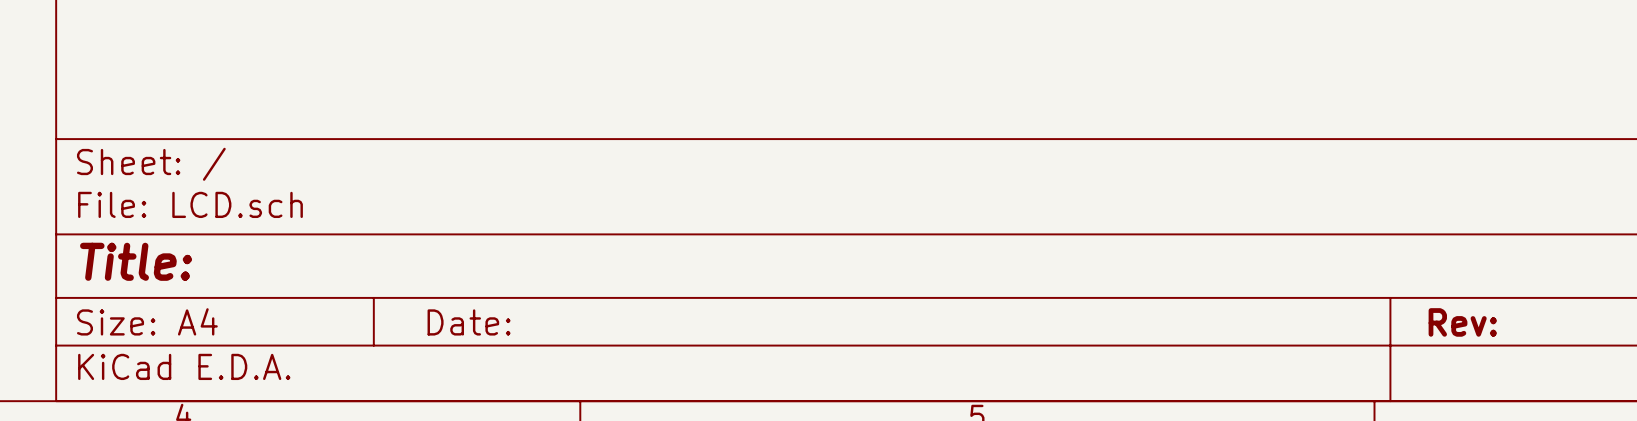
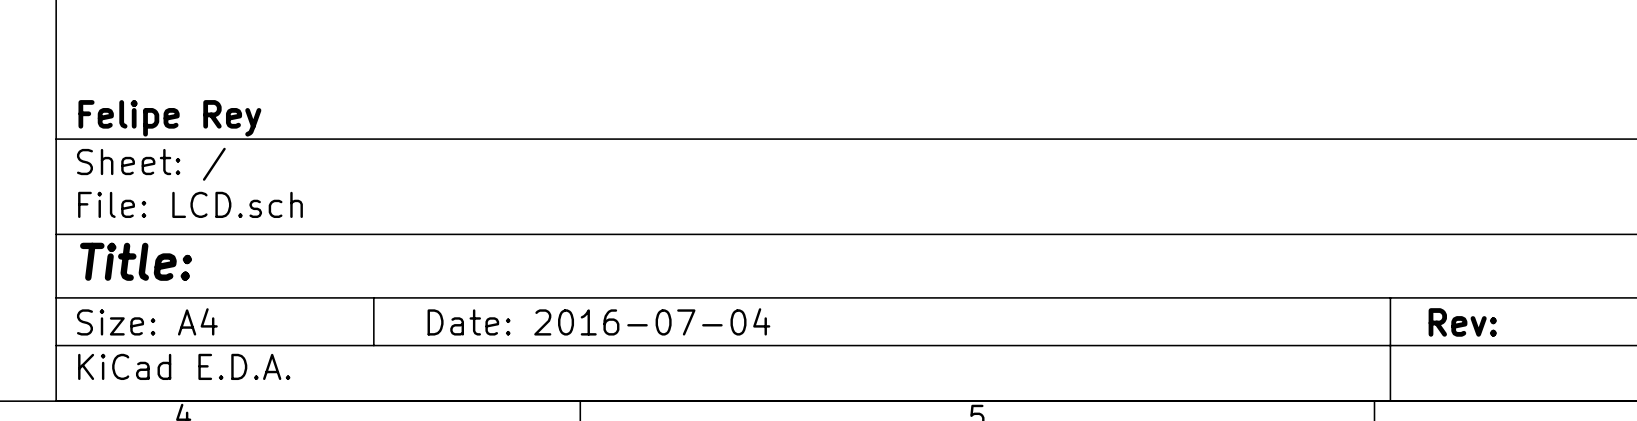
title block: none -> Felipe Rey (169, 118)
title block: Date: (469, 322) -> Date: 2016-07-04 (598, 321)

